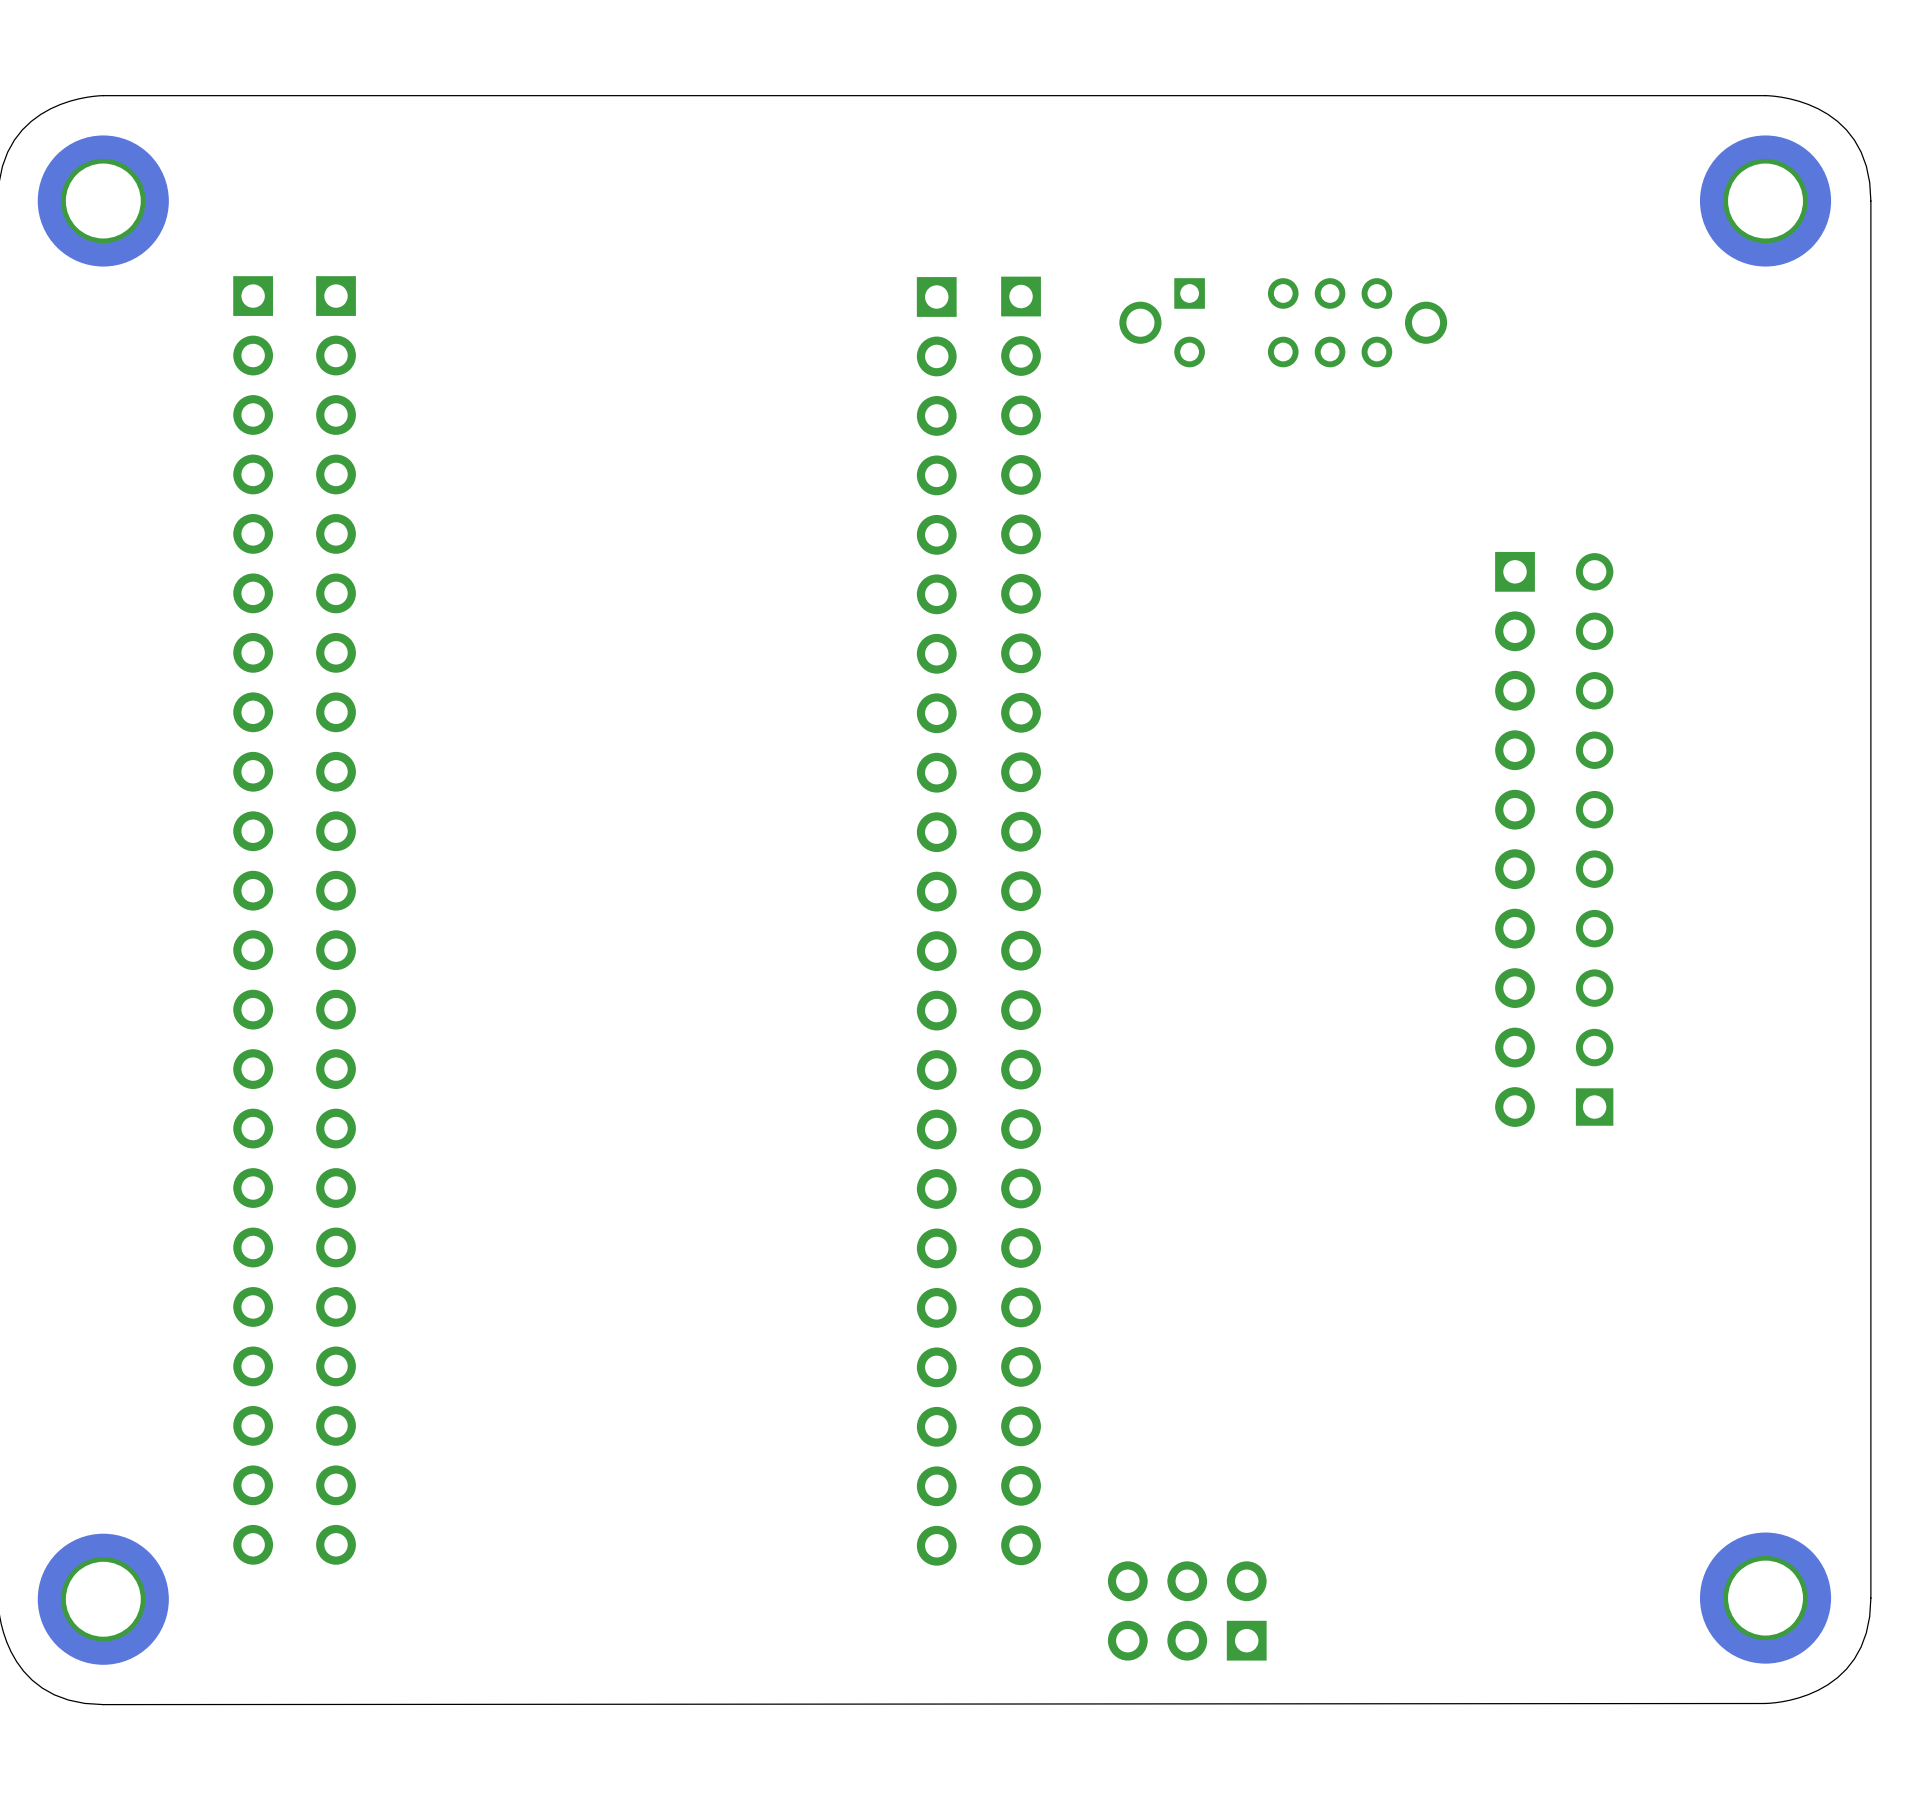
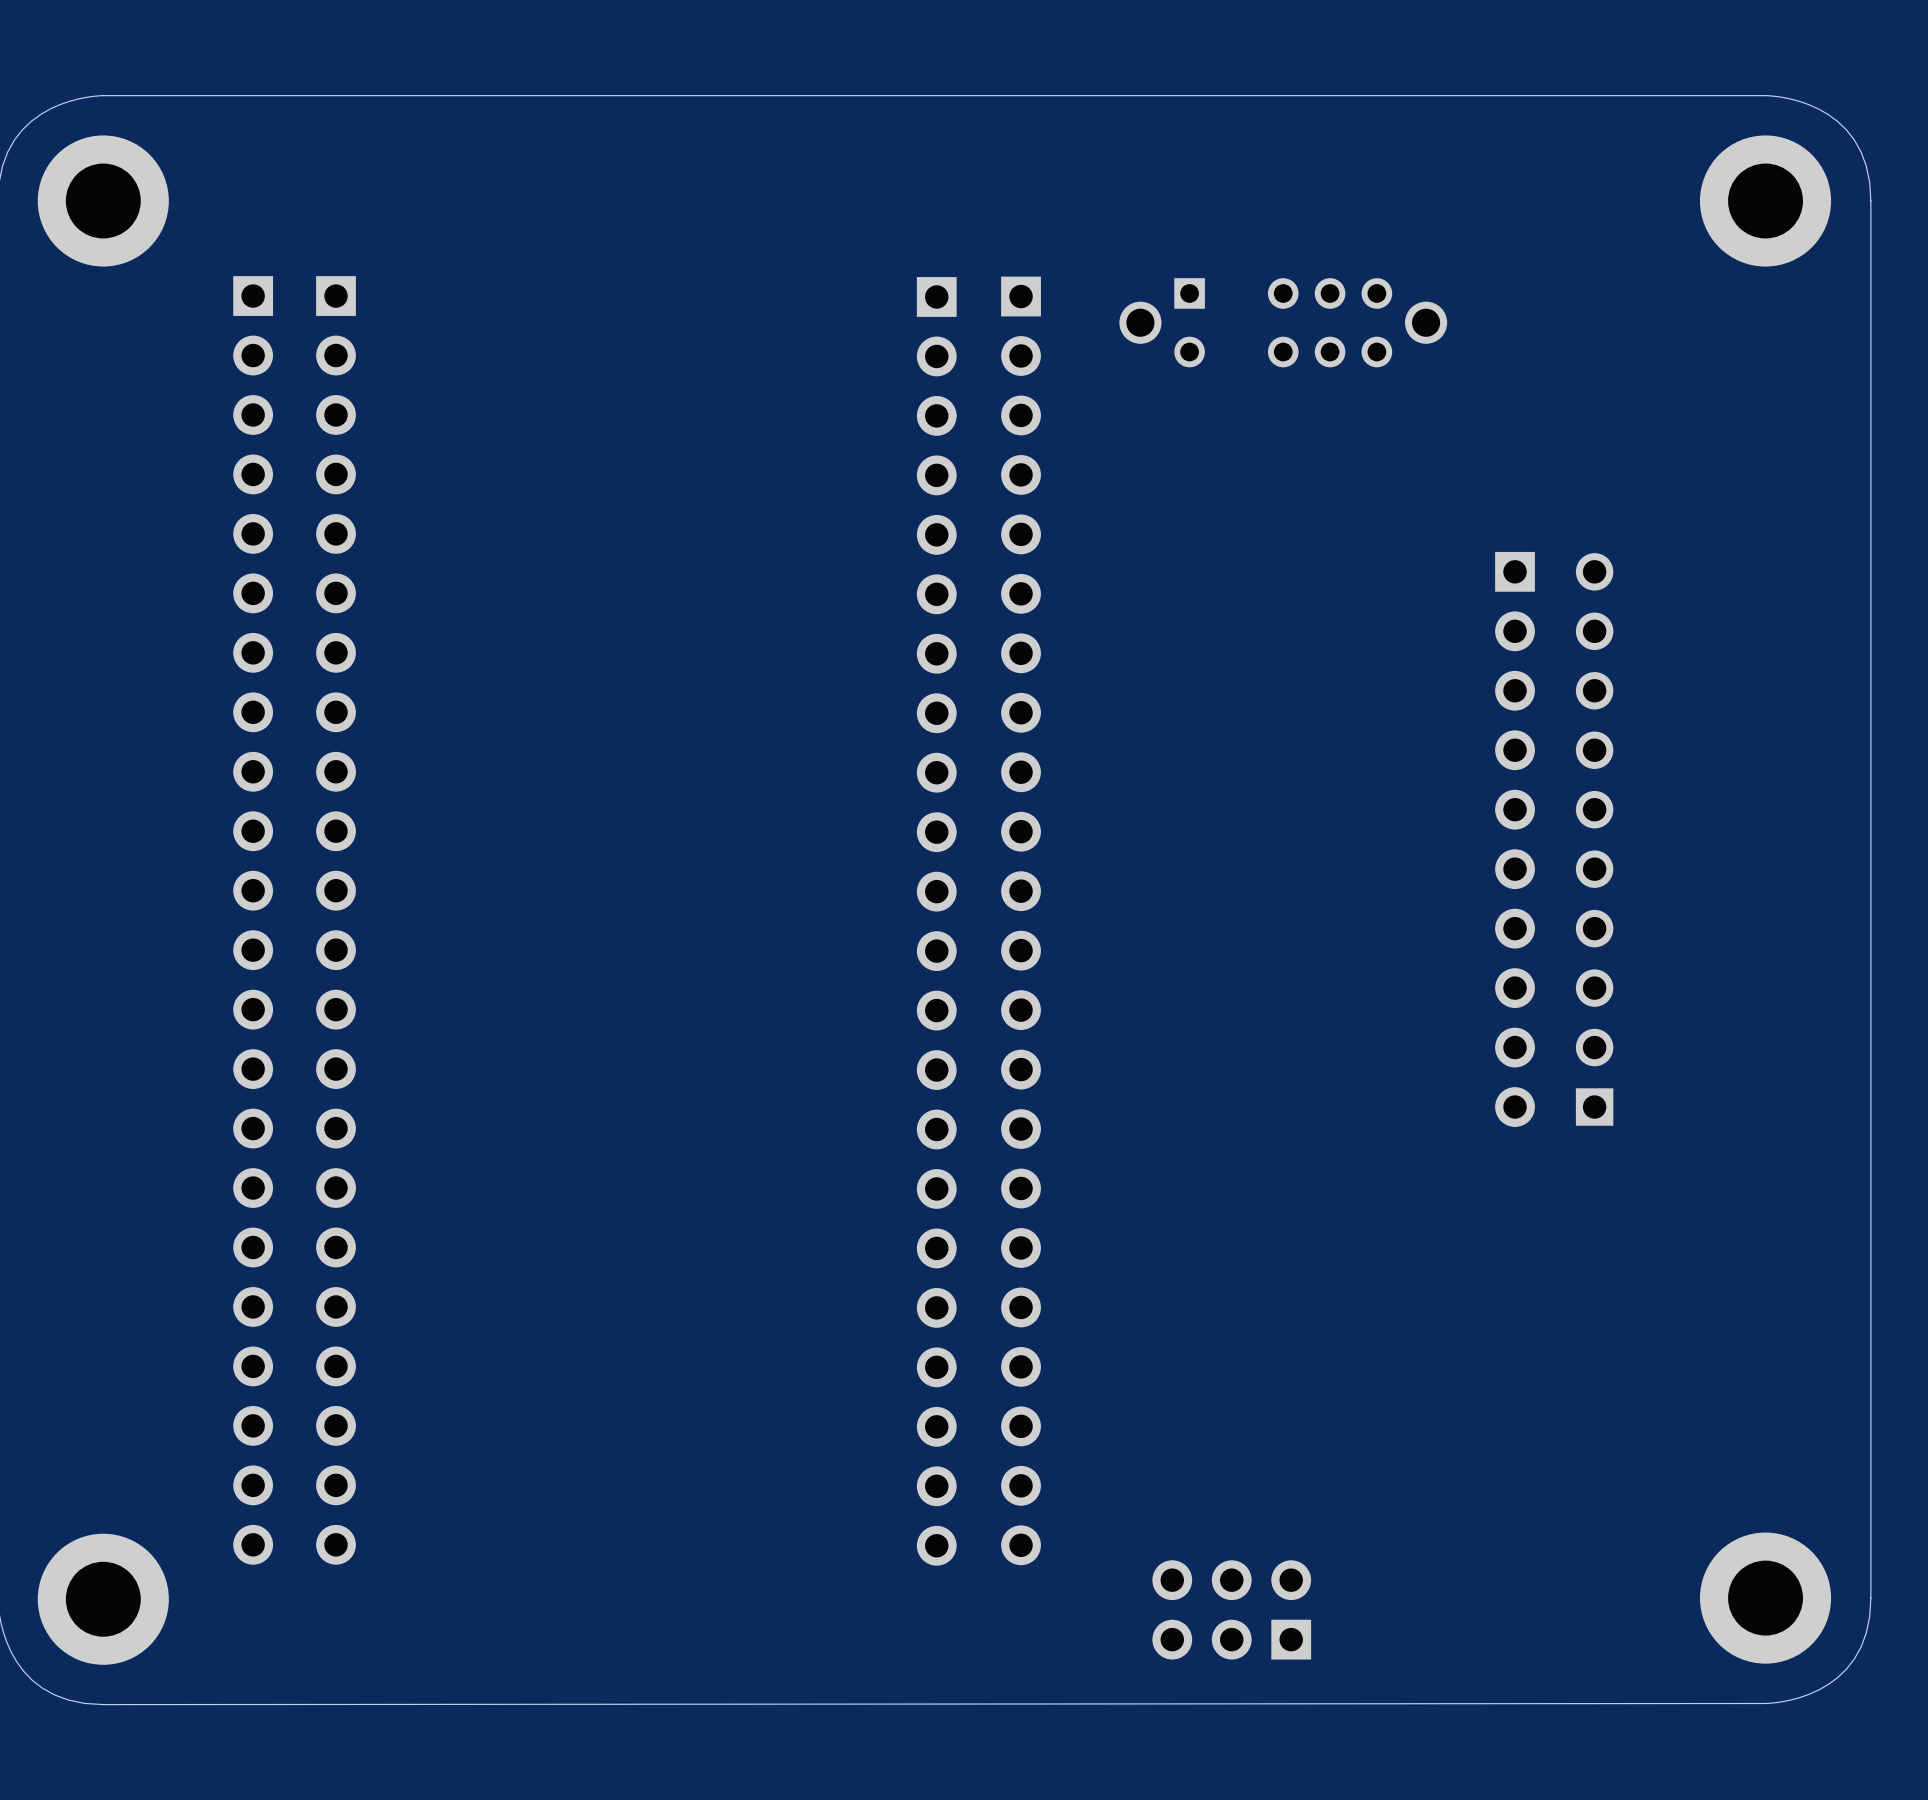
part position: (1187, 1610) -> (1231, 1609)

